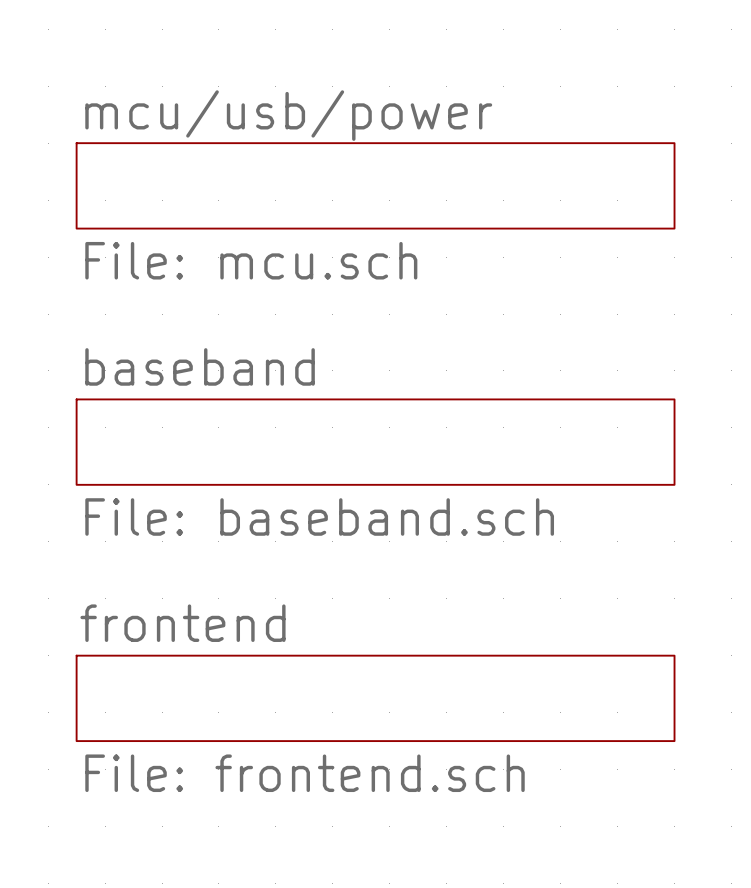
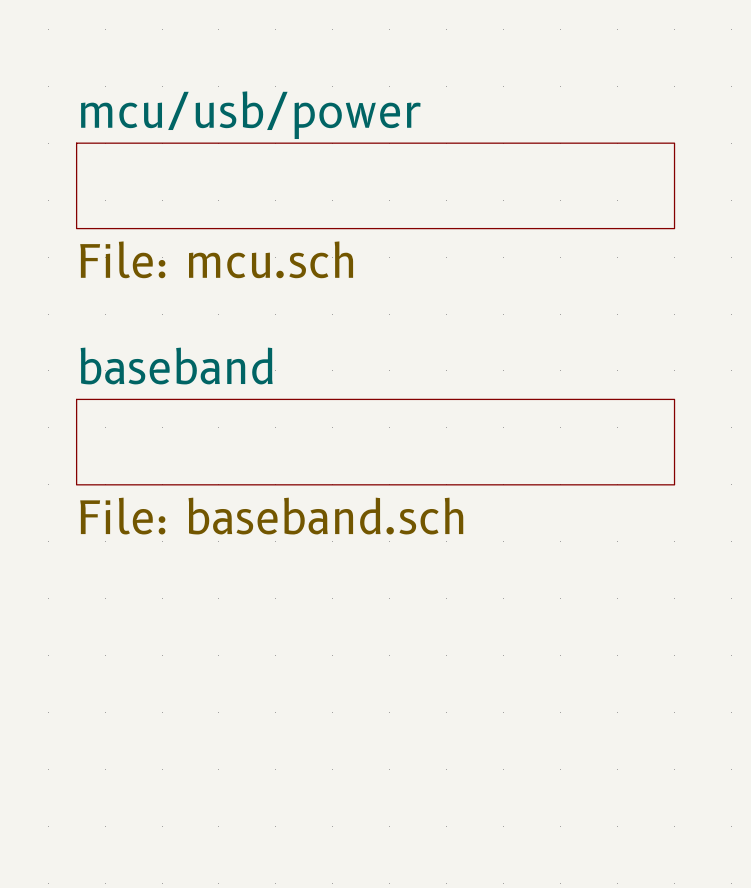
sheet frontend: File: frontend.sch (375, 698) -> none

